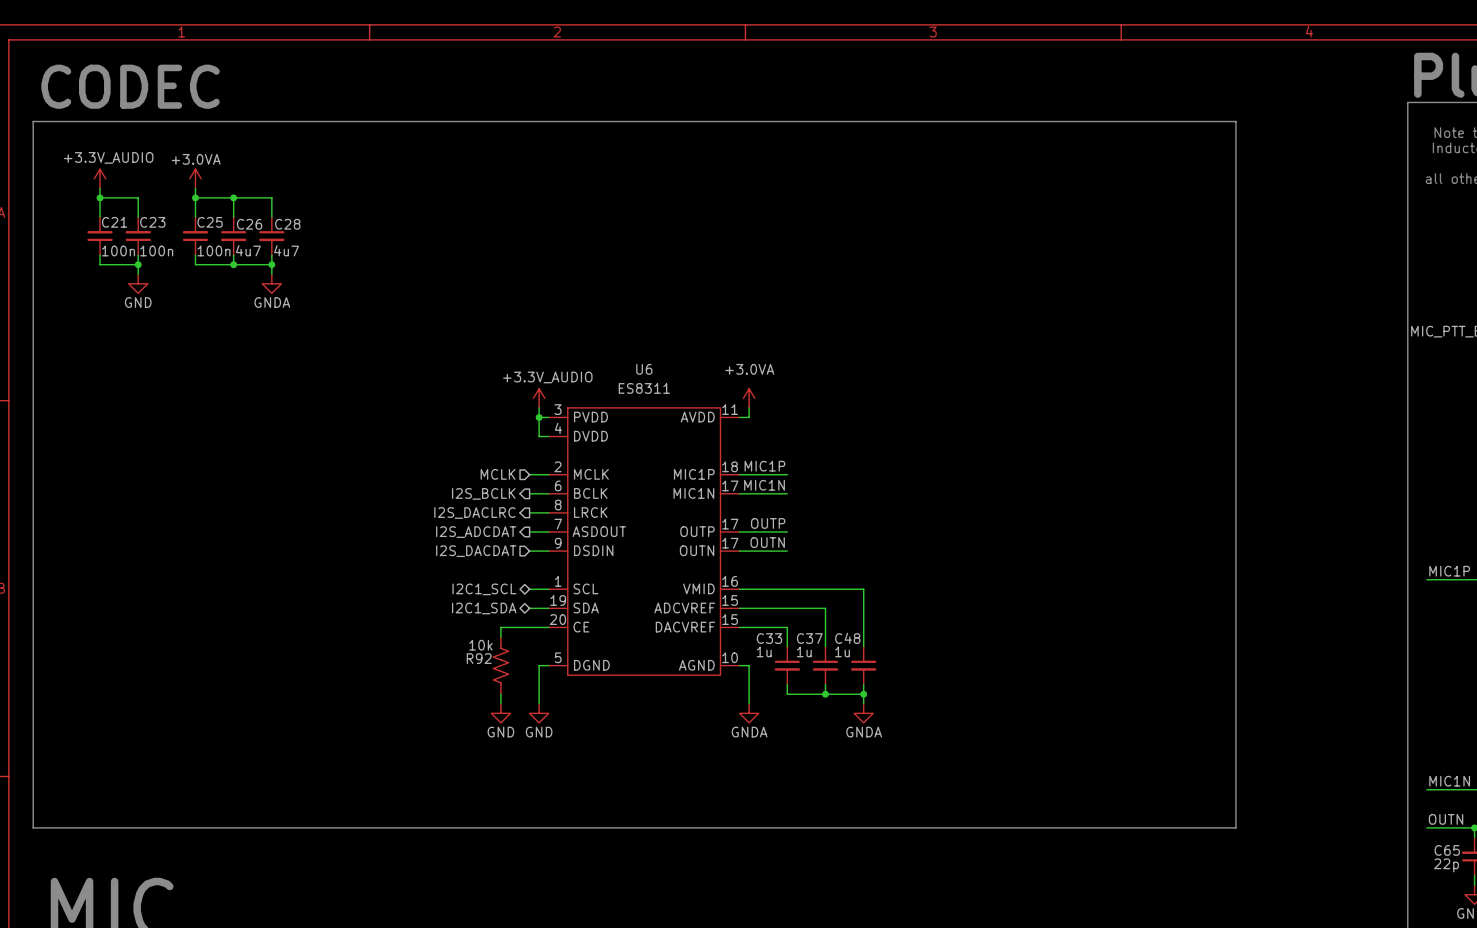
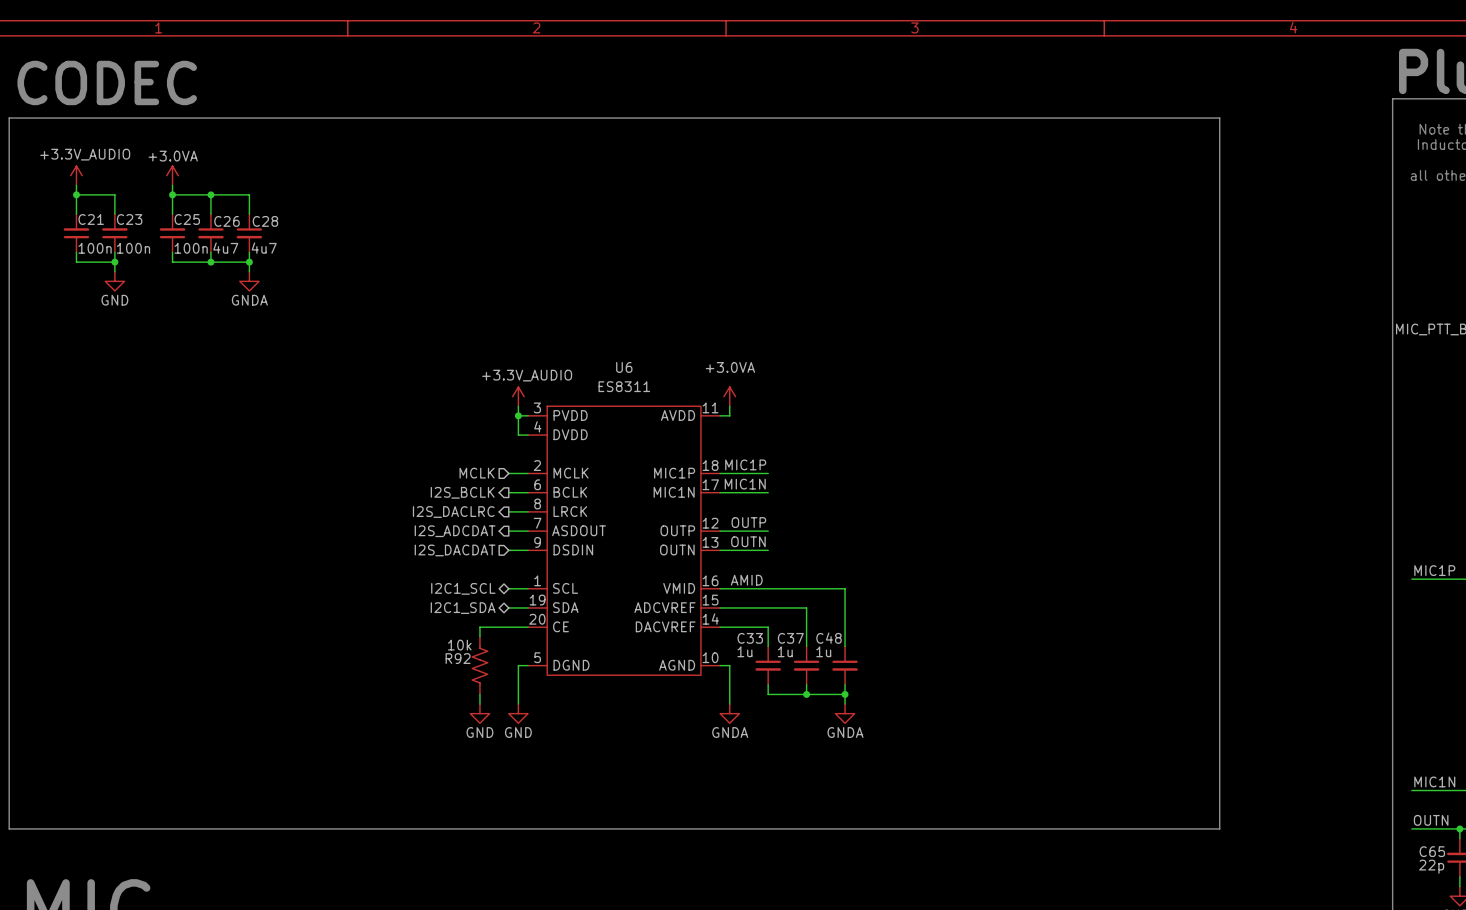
U6 pin number: 17 (730, 524) -> 12 (710, 523)
U6 pin number: 17 (730, 543) -> 13 (710, 542)
label: none -> AMID (746, 580)
U6 pin number: 15 (730, 619) -> 14 (710, 619)

